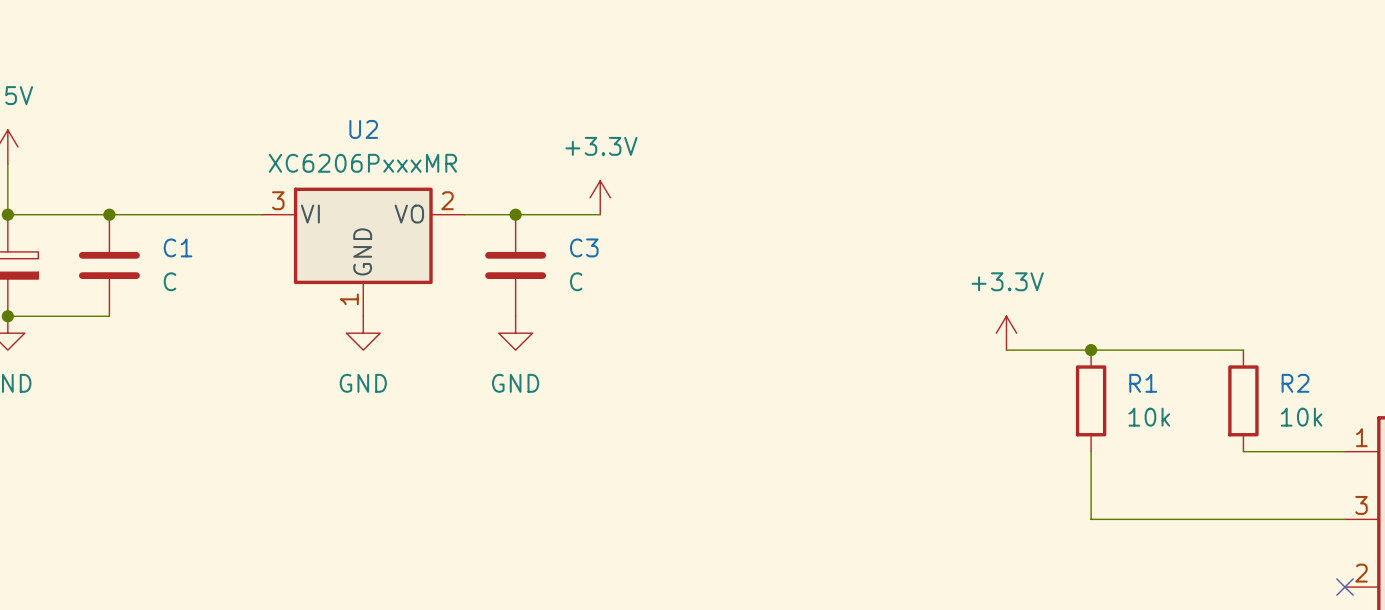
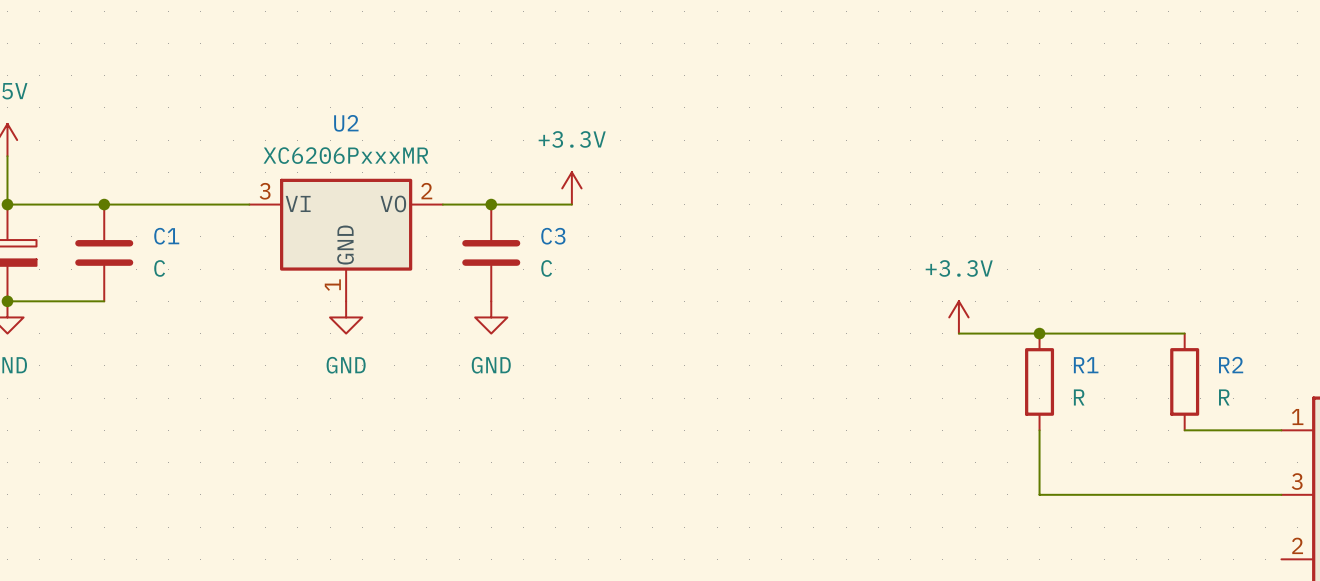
R1 value: 10k (1149, 417) -> R (1079, 397)
R2 value: 10k (1301, 417) -> R (1224, 397)
no-connect mark: (1344, 587) -> none

